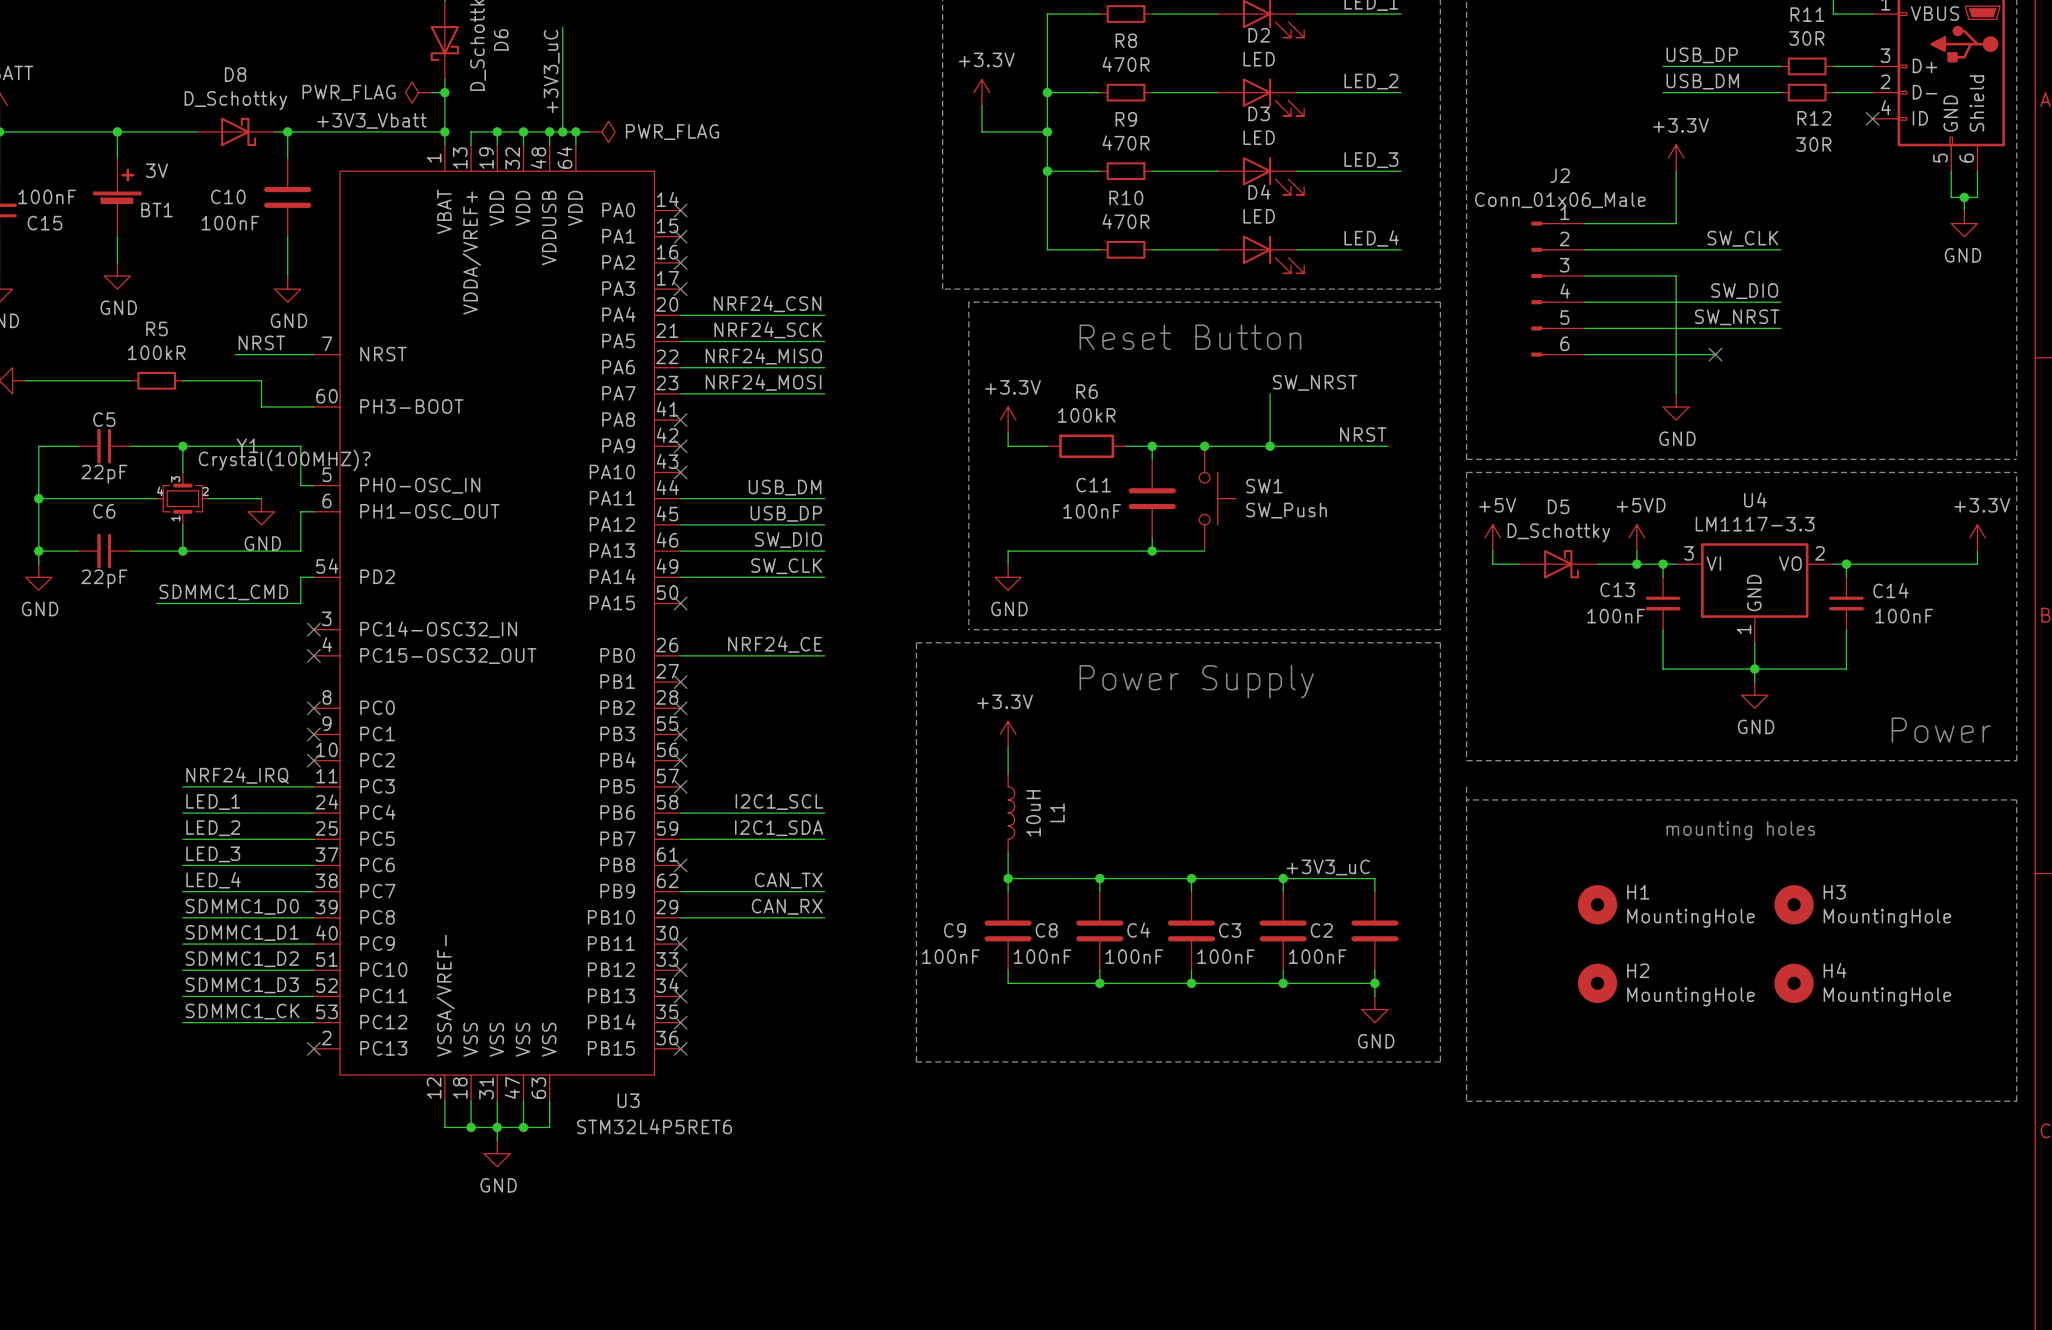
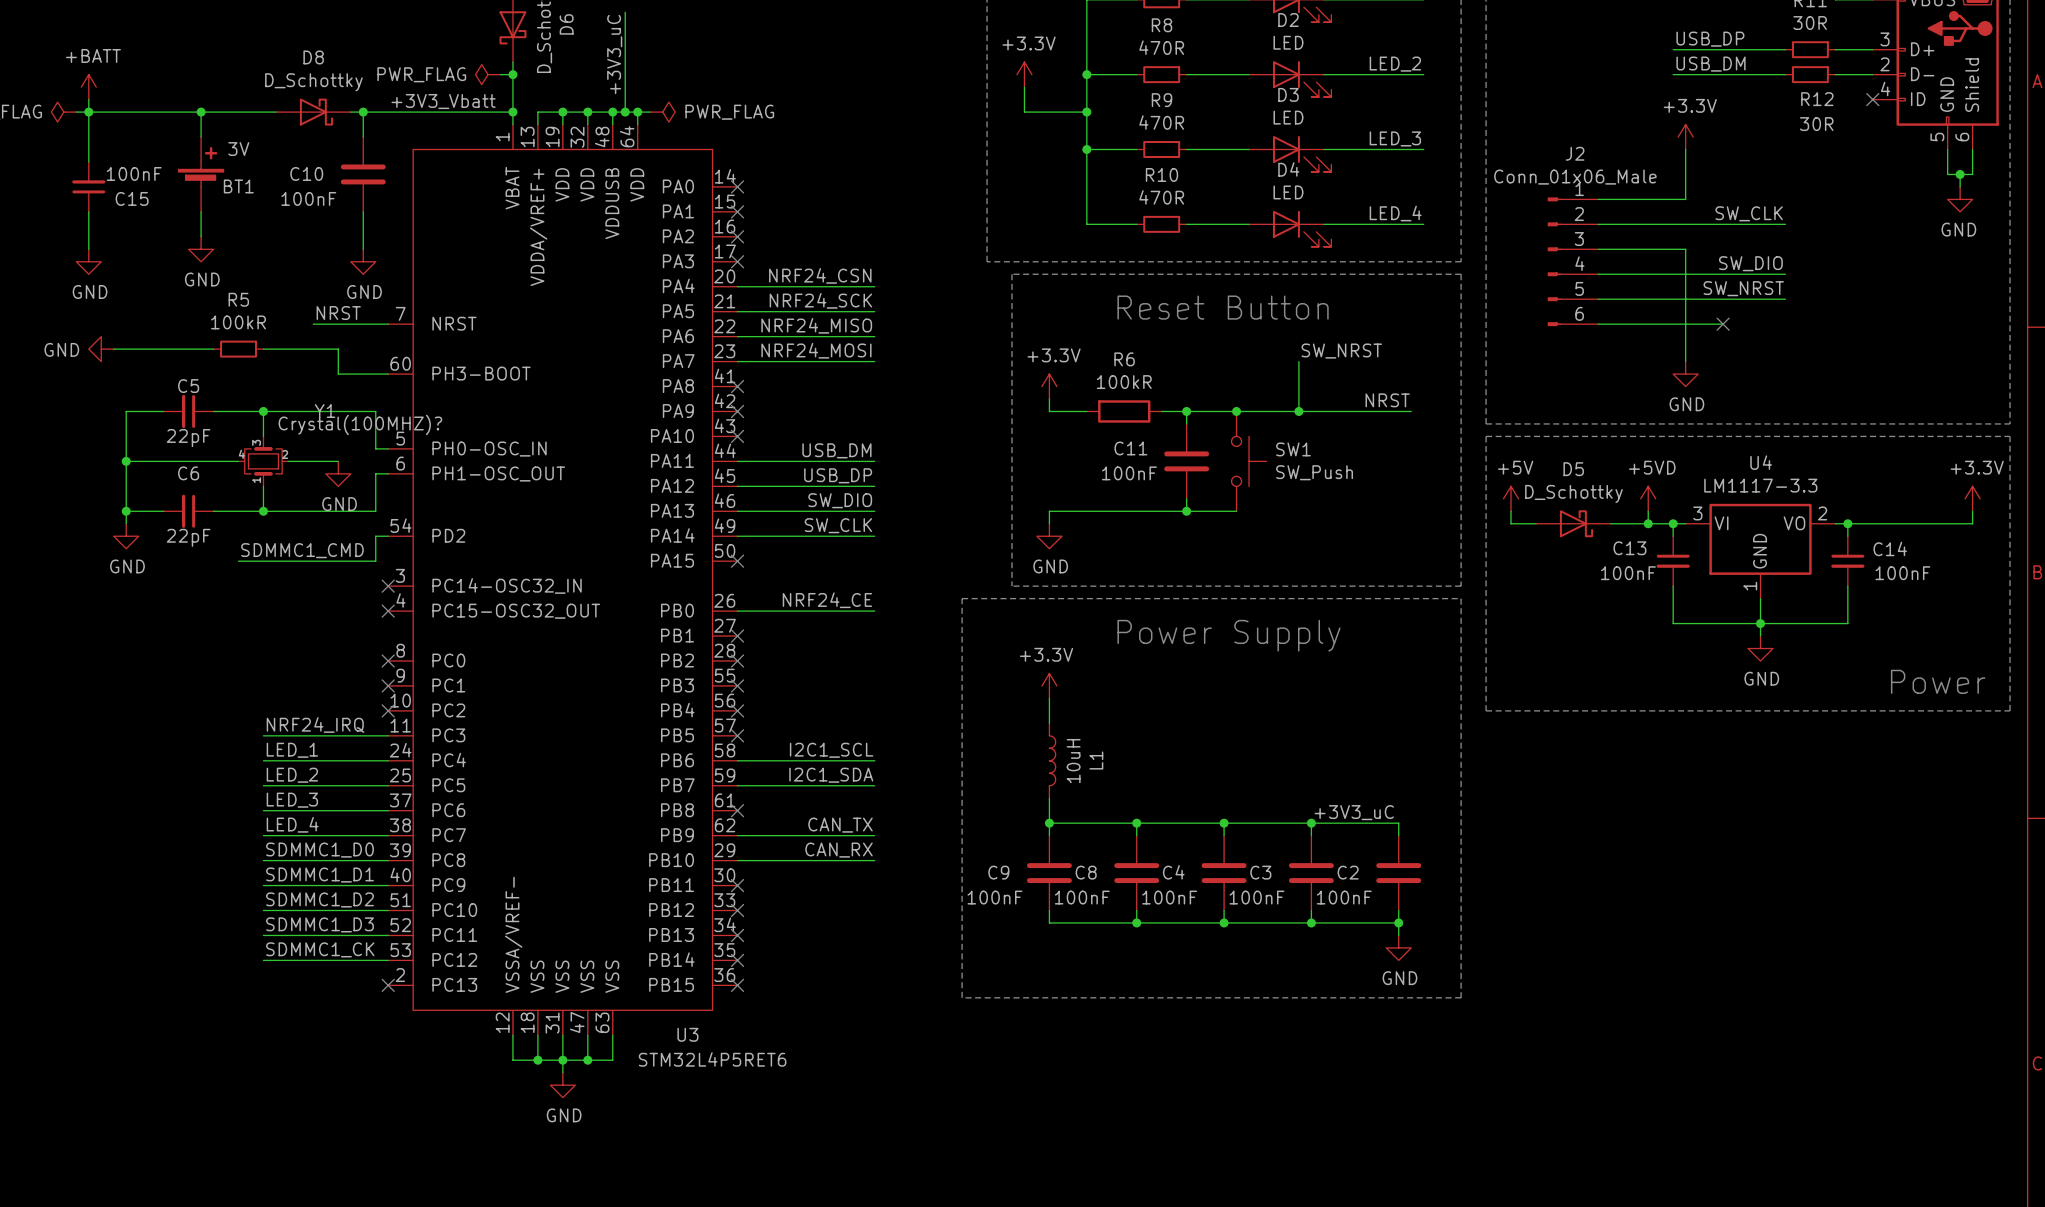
line: (1466, 786) (1466, 1101) (2016, 1101) (2016, 799) (1466, 799) -> none
text: mounting holes (1740, 830) -> none
H1: MountingHole (1597, 904) -> none
H3: MountingHole (1794, 904) -> none
H2: MountingHole (1597, 983) -> none
H4: MountingHole (1794, 983) -> none

